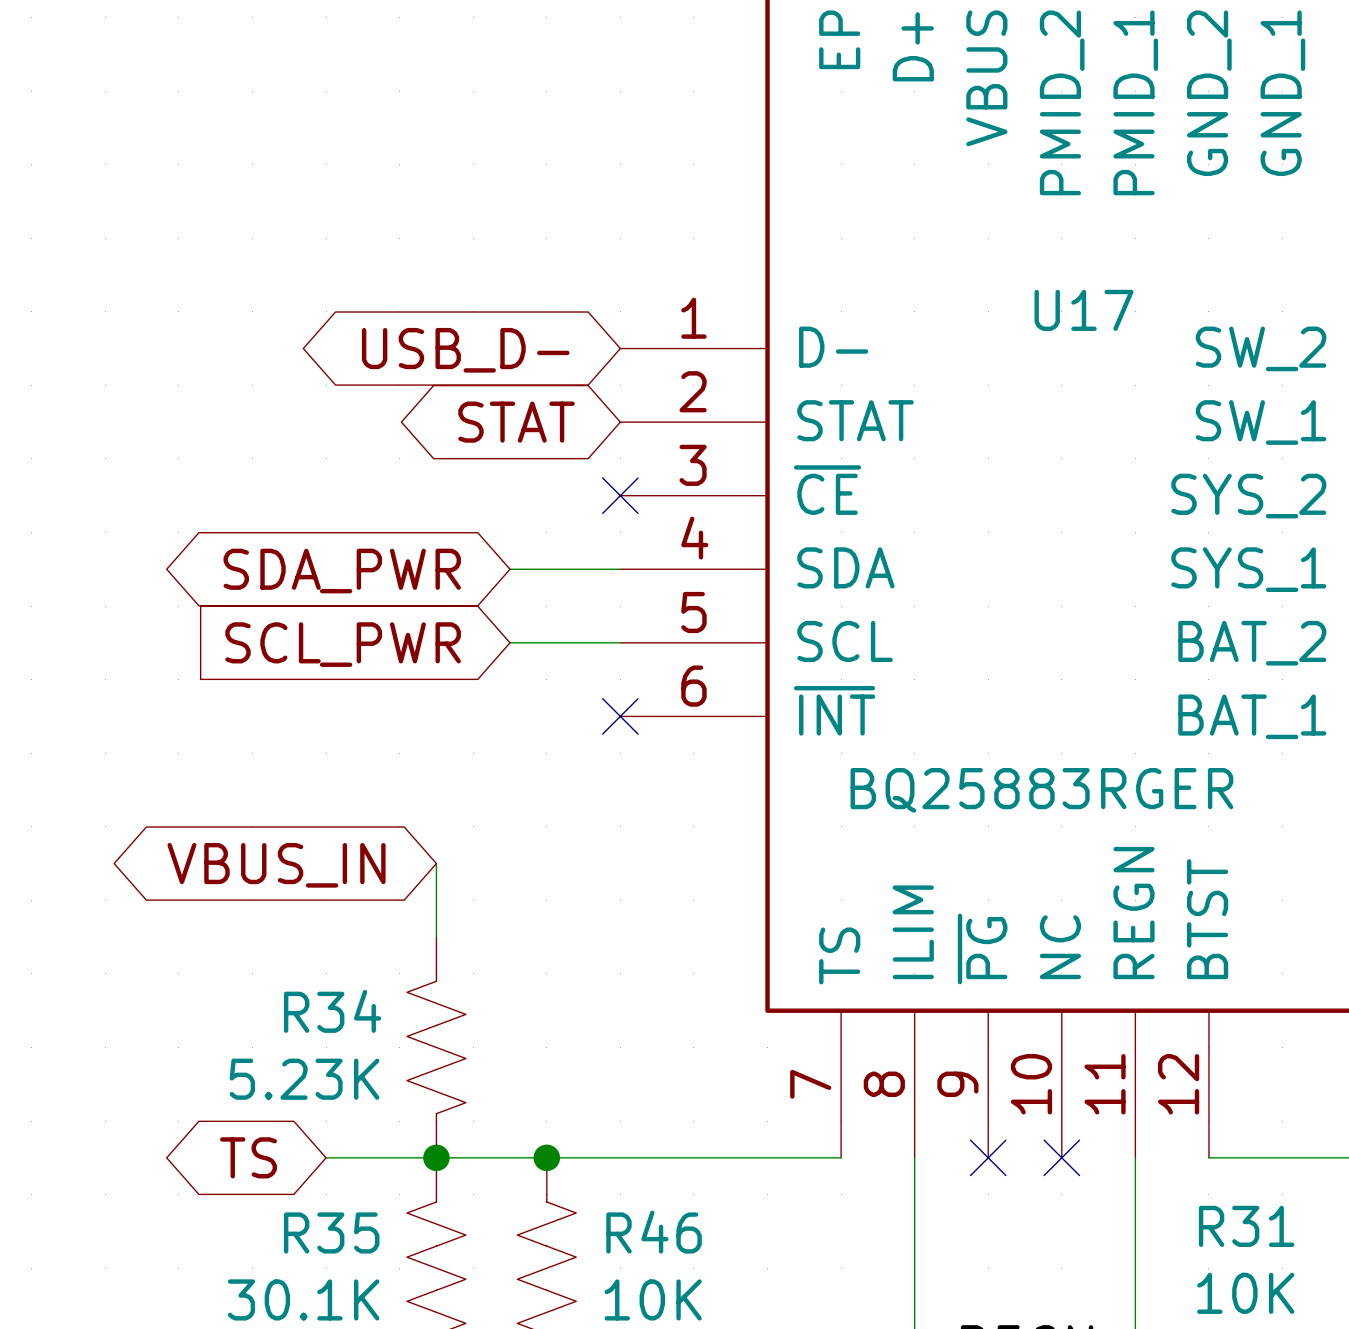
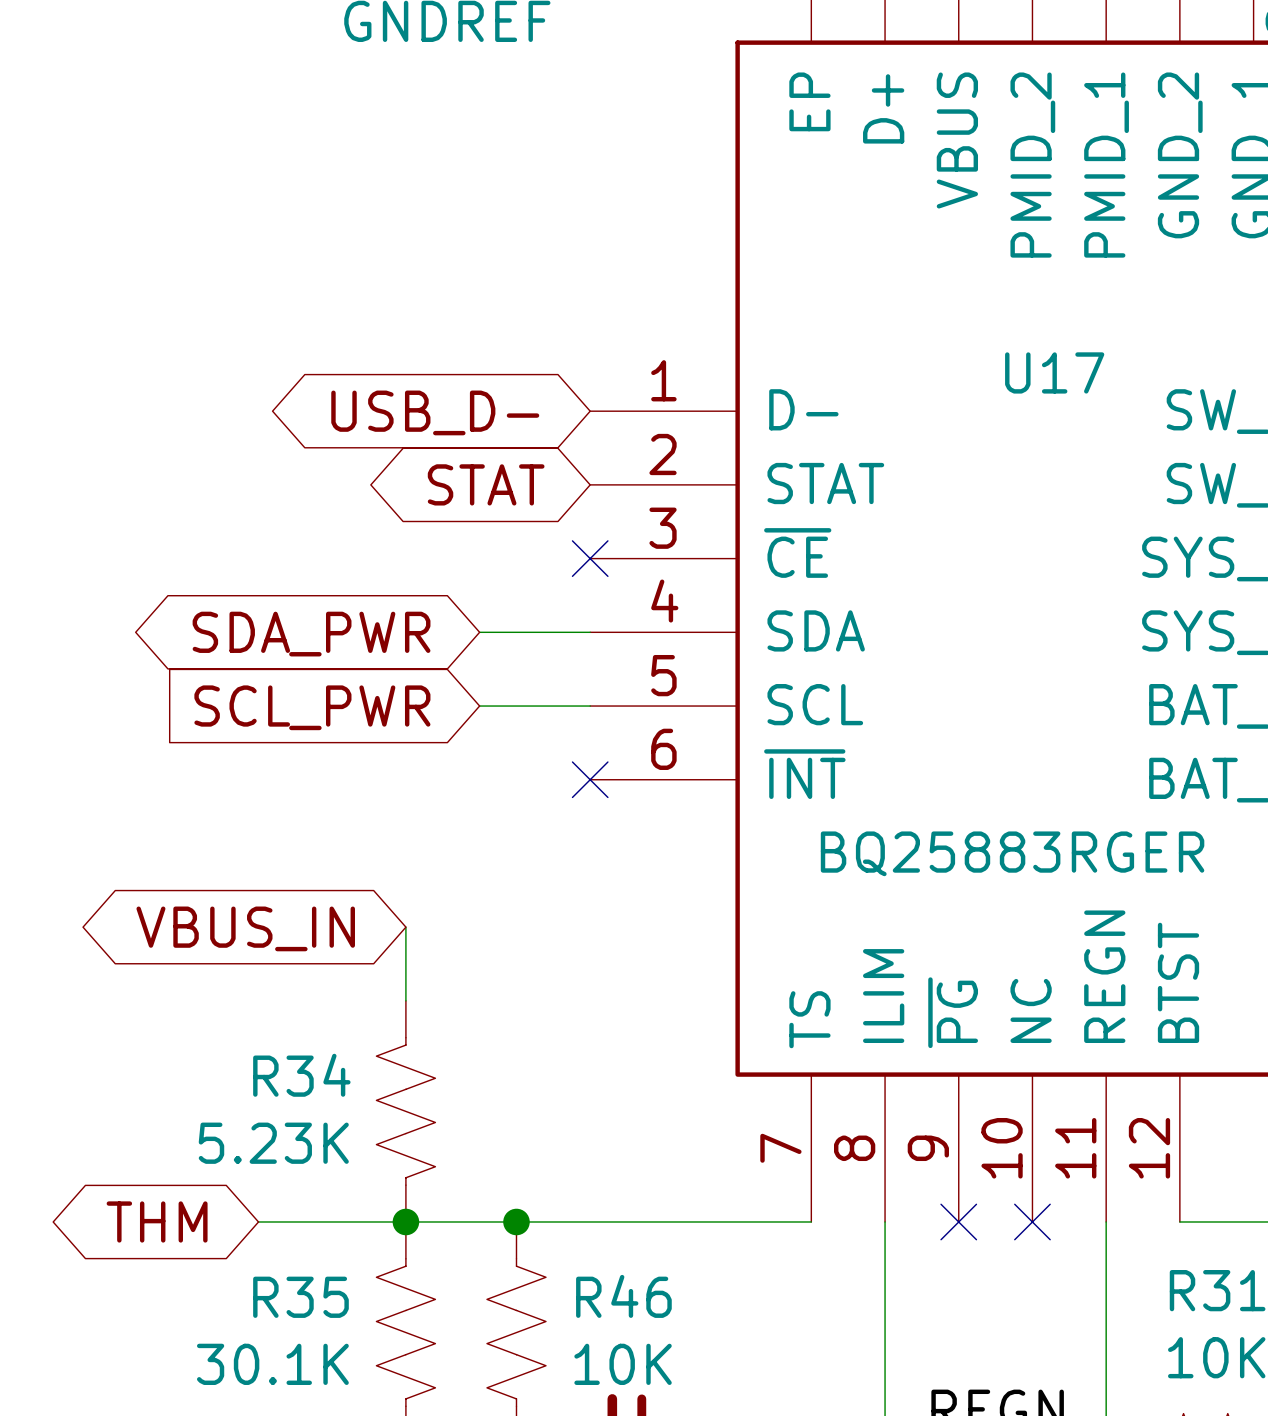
global label: none -> THM (157, 1221)
global label: TS (248, 1157) -> none
wire: none -> (258, 1221) (295, 1221)

